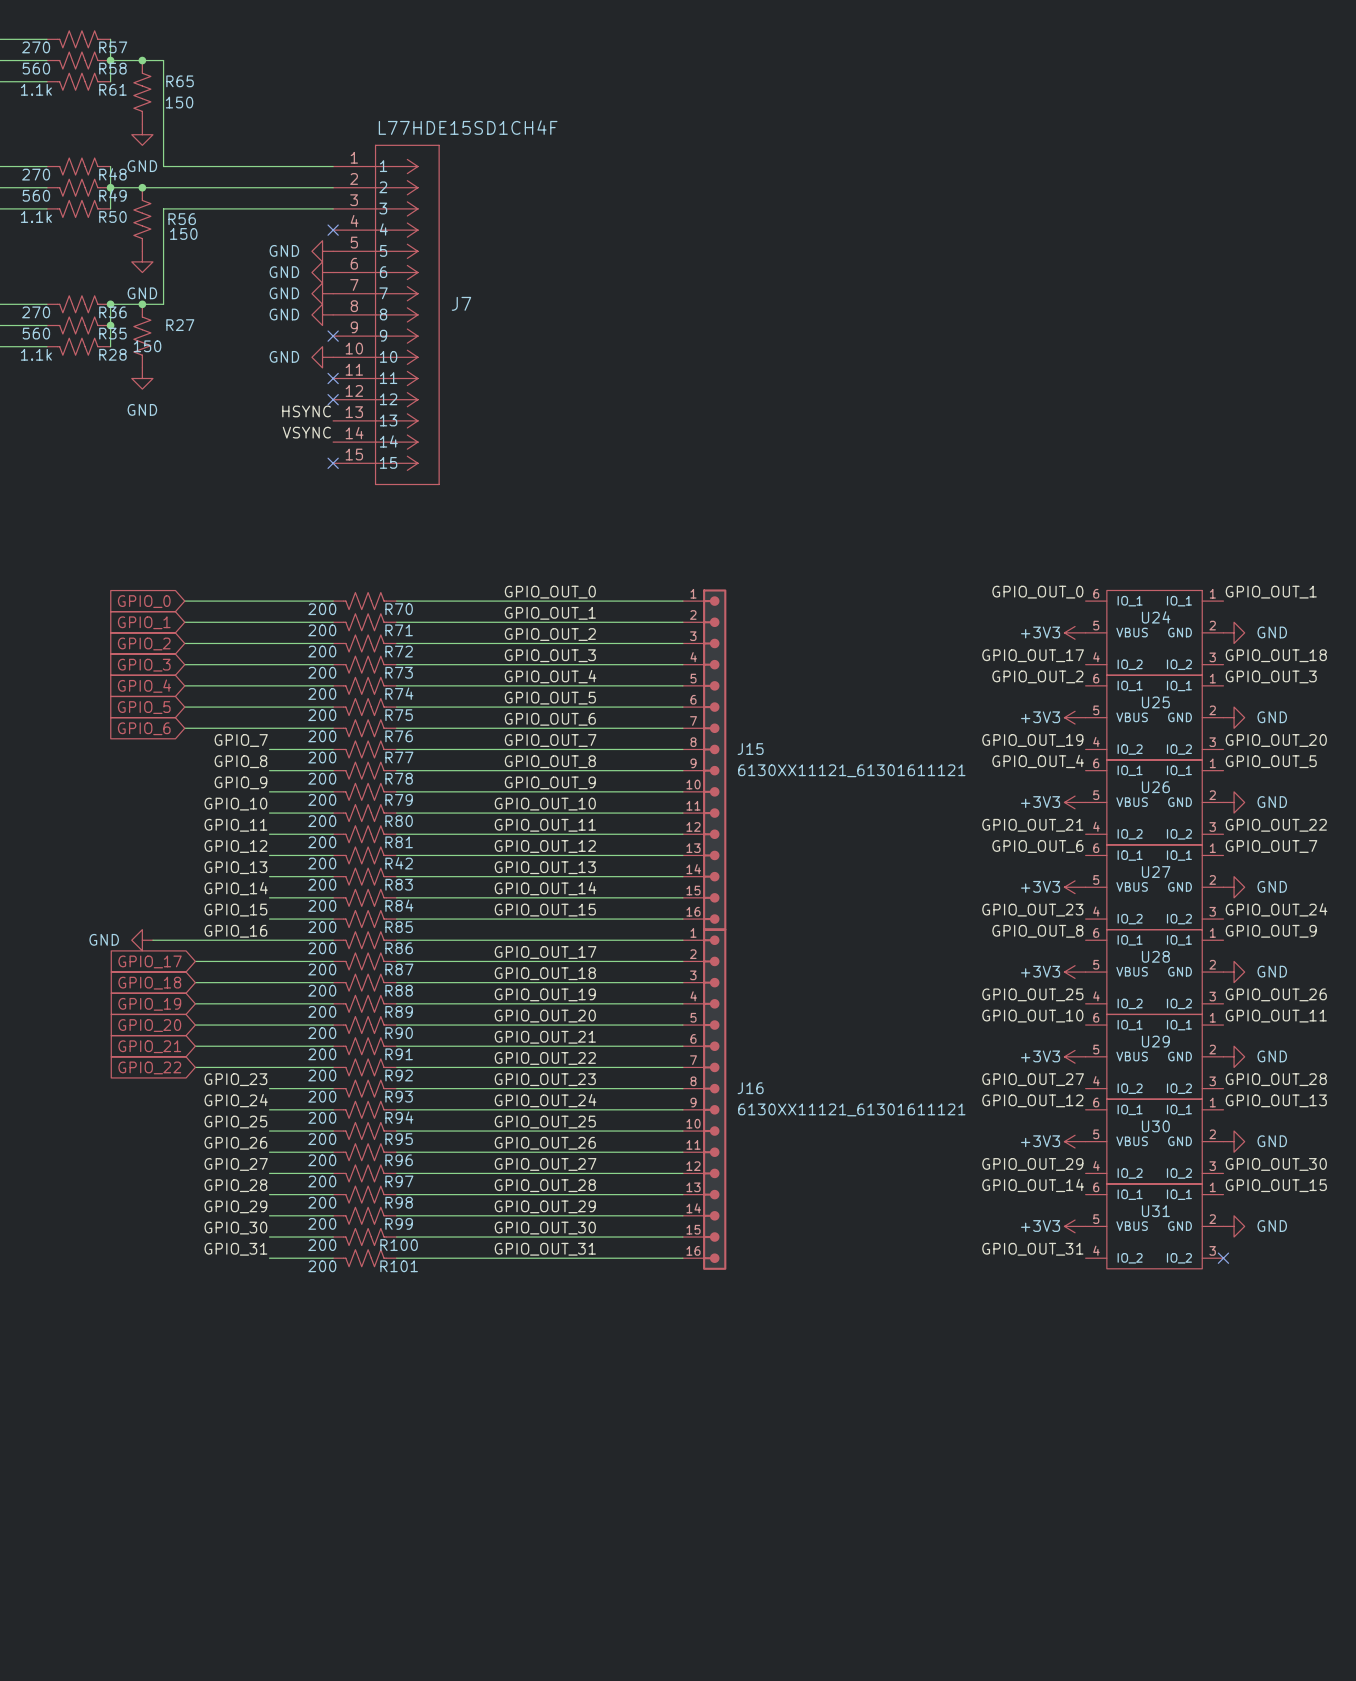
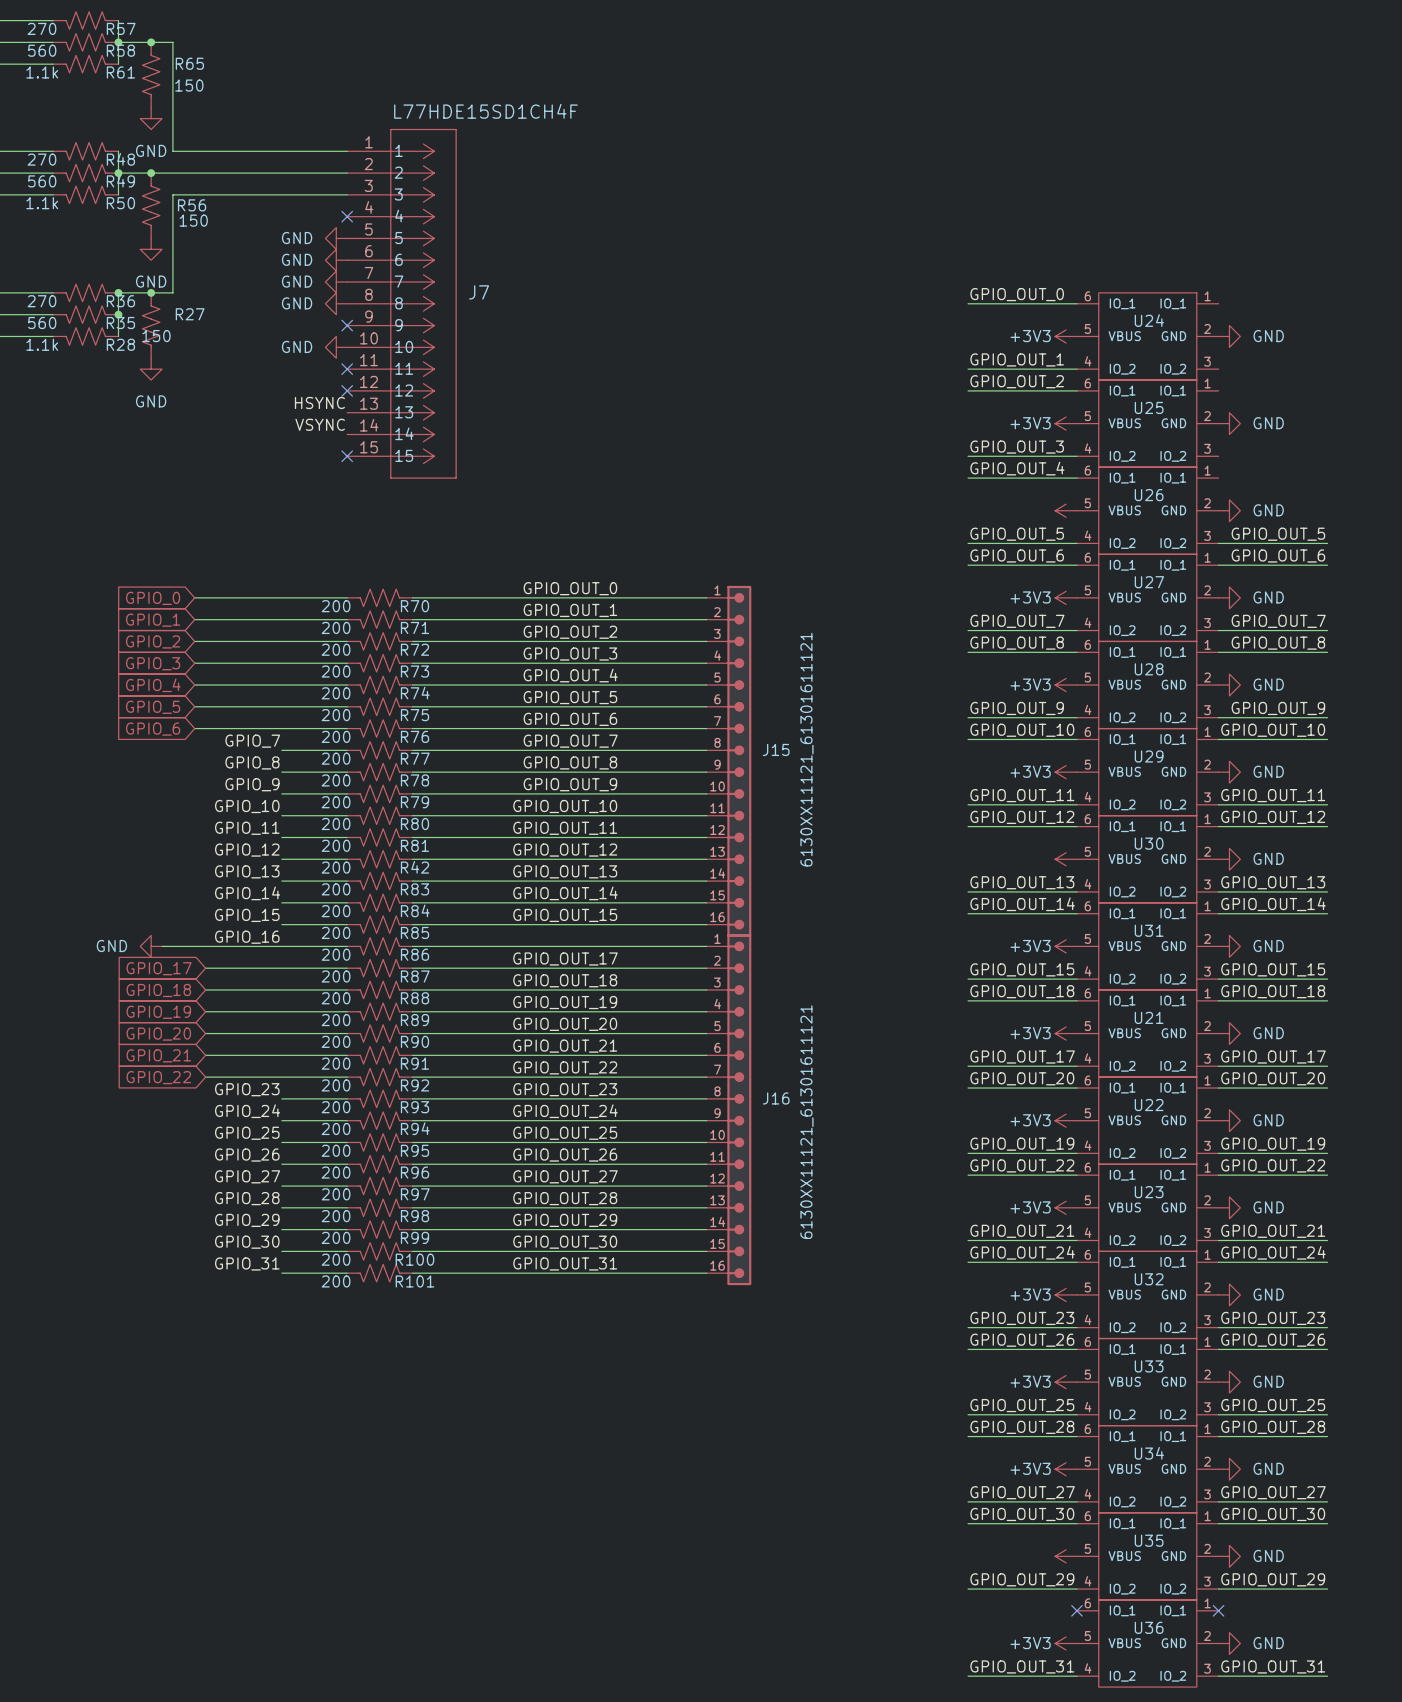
label: none -> GPIO_OUT_0 (1017, 294)
wire: none -> (968, 303) (1076, 303)
power symbol: none -> +3V3 (1066, 336)
power symbol: none -> GND (1229, 336)
label: none -> GPIO_OUT_1 (1017, 359)
wire: none -> (968, 369) (1076, 369)
label: none -> GPIO_OUT_2 (1017, 381)
wire: none -> (968, 390) (1076, 390)
power symbol: none -> +3V3 (1066, 423)
power symbol: none -> GND (1229, 423)
label: none -> GPIO_OUT_3 (1017, 447)
wire: none -> (968, 456) (1076, 456)
label: none -> GPIO_OUT_4 (1017, 468)
wire: none -> (968, 478) (1076, 478)
power symbol: none -> (1066, 510)
power symbol: none -> GND (1229, 510)
label: none -> GPIO_OUT_5 (1017, 534)
label: none -> GPIO_OUT_5 (1278, 534)
wire: none -> (968, 543) (1076, 543)
wire: none -> (1218, 543) (1327, 543)
label: none -> GPIO_OUT_6 (1017, 555)
label: none -> GPIO_OUT_6 (1278, 555)
wire: none -> (968, 565) (1076, 565)
wire: none -> (1218, 565) (1327, 565)
label: GPIO_OUT_0 (1037, 592) -> none
label: GPIO_OUT_1 (1271, 592) -> none
power symbol: none -> +3V3 (1066, 597)
power symbol: none -> GND (1229, 597)
label: none -> GPIO_OUT_7 (1017, 621)
label: none -> GPIO_OUT_7 (1278, 621)
wire: none -> (968, 630) (1076, 630)
power symbol: +3V3 (1075, 632) -> none
U24 position: (1154, 632) -> (1147, 336)
wire: none -> (1218, 630) (1327, 630)
power symbol: GND (1234, 632) -> none
wire: none -> (968, 652) (1076, 652)
wire: none -> (1218, 652) (1327, 652)
label: GPIO_OUT_17 (1033, 655) -> GPIO_OUT_8 (1017, 643)
label: GPIO_OUT_18 (1276, 655) -> GPIO_OUT_8 (1278, 643)
label: GPIO_OUT_2 (1037, 676) -> none
label: GPIO_OUT_3 (1271, 676) -> none
power symbol: none -> +3V3 (1066, 685)
power symbol: none -> GND (1229, 685)
label: none -> GPIO_OUT_9 (1017, 708)
label: none -> GPIO_OUT_9 (1278, 708)
wire: none -> (968, 717) (1076, 717)
power symbol: +3V3 (1075, 717) -> none
U25 position: (1154, 717) -> (1147, 423)
wire: none -> (1218, 717) (1327, 717)
power symbol: GND (1234, 717) -> none
wire: none -> (968, 739) (1076, 739)
wire: none -> (1218, 739) (1327, 739)
label: GPIO_OUT_19 (1032, 740) -> GPIO_OUT_10 (1022, 730)
label: GPIO_OUT_20 (1276, 740) -> GPIO_OUT_10 (1273, 730)
label: GPIO_OUT_4 (1038, 761) -> none
label: GPIO_OUT_5 (1271, 761) -> none
J15 value rotation: 0° (851, 770) -> 90° counterclockwise (806, 749)
power symbol: none -> +3V3 (1066, 772)
power symbol: none -> GND (1229, 772)
label: none -> GPIO_OUT_11 (1022, 795)
label: none -> GPIO_OUT_11 (1273, 795)
wire: none -> (968, 804) (1076, 804)
power symbol: +3V3 (1075, 802) -> none
U26 position: (1154, 802) -> (1147, 510)
wire: none -> (1218, 804) (1327, 804)
power symbol: GND (1234, 802) -> none
wire: none -> (968, 826) (1076, 826)
wire: none -> (1218, 826) (1327, 826)
label: GPIO_OUT_21 (1032, 825) -> GPIO_OUT_12 (1022, 817)
label: GPIO_OUT_22 (1276, 825) -> GPIO_OUT_12 (1273, 817)
label: GPIO_OUT_6 (1037, 846) -> none
label: GPIO_OUT_7 (1271, 846) -> none
power symbol: none -> (1066, 859)
power symbol: none -> GND (1229, 859)
label: none -> GPIO_OUT_13 (1022, 882)
label: none -> GPIO_OUT_13 (1273, 882)
wire: none -> (968, 891) (1076, 891)
power symbol: +3V3 (1075, 887) -> none
U27 position: (1154, 887) -> (1147, 597)
wire: none -> (1218, 891) (1327, 891)
power symbol: GND (1234, 887) -> none
wire: none -> (968, 913) (1076, 913)
wire: none -> (1218, 913) (1327, 913)
label: GPIO_OUT_24 (1276, 909) -> GPIO_OUT_14 (1273, 904)
label: GPIO_OUT_23 (1032, 910) -> GPIO_OUT_14 (1022, 904)
label: GPIO_OUT_8 (1037, 931) -> none
label: GPIO_OUT_9 (1271, 931) -> none
power symbol: none -> +3V3 (1066, 946)
power symbol: none -> GND (1229, 946)
label: none -> GPIO_OUT_15 (1022, 969)
label: none -> GPIO_OUT_15 (1273, 969)
wire: none -> (968, 979) (1076, 979)
power symbol: +3V3 (1075, 972) -> none
U28 position: (1154, 972) -> (1147, 685)
wire: none -> (1218, 979) (1327, 979)
power symbol: GND (1234, 972) -> none
wire: none -> (968, 1000) (1076, 1000)
wire: none -> (1218, 1000) (1327, 1000)
label: GPIO_OUT_25 (1032, 994) -> GPIO_OUT_18 (1022, 991)
label: GPIO_OUT_26 (1276, 994) -> GPIO_OUT_18 (1273, 991)
label: GPIO_OUT_10 (1032, 1016) -> none
label: GPIO_OUT_11 (1276, 1016) -> none
power symbol: none -> +3V3 (1066, 1033)
U21: none -> (1147, 1033)
power symbol: none -> GND (1229, 1033)
label: none -> GPIO_OUT_17 (1022, 1057)
label: none -> GPIO_OUT_17 (1273, 1057)
wire: none -> (968, 1066) (1076, 1066)
power symbol: +3V3 (1075, 1056) -> none
U29 position: (1154, 1056) -> (1147, 772)
wire: none -> (1218, 1066) (1327, 1066)
power symbol: GND (1234, 1056) -> none
wire: none -> (968, 1088) (1076, 1088)
wire: none -> (1218, 1088) (1327, 1088)
label: GPIO_OUT_27 (1033, 1079) -> GPIO_OUT_20 (1022, 1078)
label: GPIO_OUT_28 (1276, 1079) -> GPIO_OUT_20 (1273, 1078)
label: GPIO_OUT_12 (1032, 1100) -> none
label: GPIO_OUT_13 (1276, 1100) -> none
J16 value rotation: 0° (851, 1109) -> 90° counterclockwise (806, 1122)
power symbol: none -> +3V3 (1066, 1120)
U22: none -> (1147, 1120)
power symbol: none -> GND (1229, 1120)
label: none -> GPIO_OUT_19 (1022, 1144)
label: none -> GPIO_OUT_19 (1273, 1144)
wire: none -> (968, 1153) (1076, 1153)
power symbol: +3V3 (1075, 1141) -> none
U30 position: (1154, 1141) -> (1147, 859)
wire: none -> (1218, 1153) (1327, 1153)
power symbol: GND (1234, 1141) -> none
wire: none -> (968, 1175) (1076, 1175)
wire: none -> (1218, 1175) (1327, 1175)
label: GPIO_OUT_29 (1032, 1164) -> GPIO_OUT_22 (1022, 1165)
label: GPIO_OUT_30 (1276, 1164) -> GPIO_OUT_22 (1273, 1165)
label: GPIO_OUT_14 (1033, 1185) -> none
label: GPIO_OUT_15 (1276, 1185) -> none
power symbol: none -> +3V3 (1066, 1207)
U23: none -> (1147, 1207)
power symbol: none -> GND (1229, 1207)
label: none -> GPIO_OUT_21 (1022, 1231)
label: none -> GPIO_OUT_21 (1273, 1231)
wire: none -> (968, 1240) (1076, 1240)
power symbol: +3V3 (1075, 1226) -> none
U31 position: (1154, 1226) -> (1147, 946)
wire: none -> (1218, 1240) (1327, 1240)
power symbol: GND (1234, 1226) -> none
label: none -> GPIO_OUT_24 (1273, 1252)
wire: none -> (968, 1262) (1076, 1262)
wire: none -> (1218, 1262) (1327, 1262)
label: GPIO_OUT_31 (1032, 1249) -> GPIO_OUT_24 (1022, 1252)
no-connect mark: (1223, 1258) -> none
power symbol: none -> +3V3 (1066, 1294)
U32: none -> (1147, 1294)
power symbol: none -> GND (1229, 1294)
label: none -> GPIO_OUT_23 (1022, 1318)
label: none -> GPIO_OUT_23 (1273, 1318)
wire: none -> (968, 1327) (1076, 1327)
wire: none -> (1218, 1327) (1327, 1327)
label: none -> GPIO_OUT_26 (1022, 1340)
label: none -> GPIO_OUT_26 (1273, 1340)
wire: none -> (968, 1349) (1076, 1349)
wire: none -> (1218, 1349) (1327, 1349)
power symbol: none -> +3V3 (1066, 1382)
U33: none -> (1147, 1382)
power symbol: none -> GND (1229, 1382)
label: none -> GPIO_OUT_25 (1022, 1405)
label: none -> GPIO_OUT_25 (1273, 1405)
wire: none -> (968, 1414) (1076, 1414)
wire: none -> (1218, 1414) (1327, 1414)
label: none -> GPIO_OUT_28 (1022, 1427)
label: none -> GPIO_OUT_28 (1273, 1427)
wire: none -> (968, 1436) (1076, 1436)
wire: none -> (1218, 1436) (1327, 1436)
power symbol: none -> +3V3 (1066, 1469)
U34: none -> (1147, 1469)
power symbol: none -> GND (1229, 1469)
label: none -> GPIO_OUT_27 (1022, 1492)
label: none -> GPIO_OUT_27 (1273, 1492)
wire: none -> (968, 1501) (1076, 1501)
wire: none -> (1218, 1501) (1327, 1501)
label: none -> GPIO_OUT_30 (1022, 1514)
label: none -> GPIO_OUT_30 (1273, 1514)
wire: none -> (968, 1523) (1076, 1523)
wire: none -> (1218, 1523) (1327, 1523)
power symbol: none -> (1066, 1556)
U35: none -> (1147, 1556)
power symbol: none -> GND (1229, 1556)
label: none -> GPIO_OUT_29 (1022, 1579)
label: none -> GPIO_OUT_29 (1273, 1579)
wire: none -> (968, 1589) (1076, 1589)
wire: none -> (1218, 1589) (1327, 1589)
no-connect mark: none -> (1076, 1610)
no-connect mark: none -> (1218, 1610)
power symbol: none -> +3V3 (1066, 1643)
U36: none -> (1147, 1643)
power symbol: none -> GND (1229, 1643)
label: none -> GPIO_OUT_31 (1022, 1666)
label: none -> GPIO_OUT_31 (1273, 1666)
wire: none -> (968, 1676) (1076, 1676)
wire: none -> (1218, 1676) (1327, 1676)

